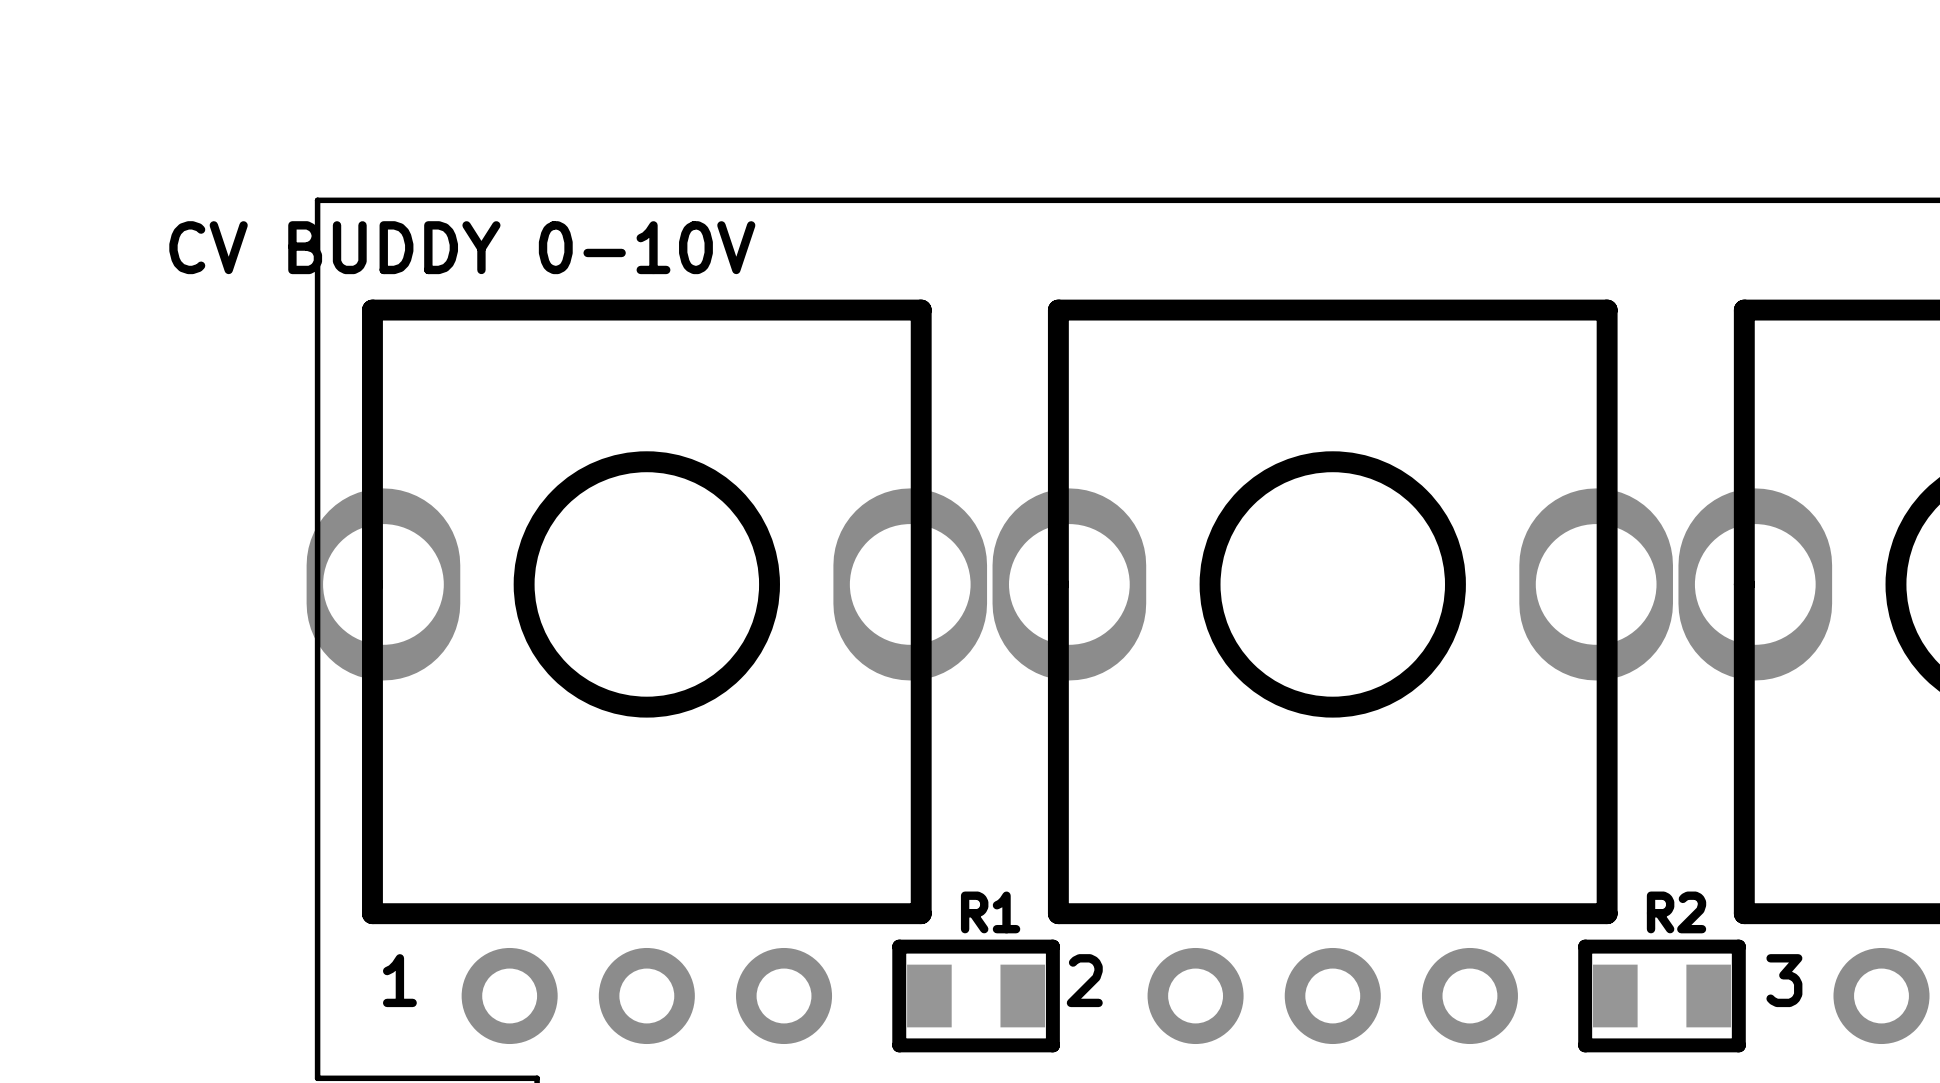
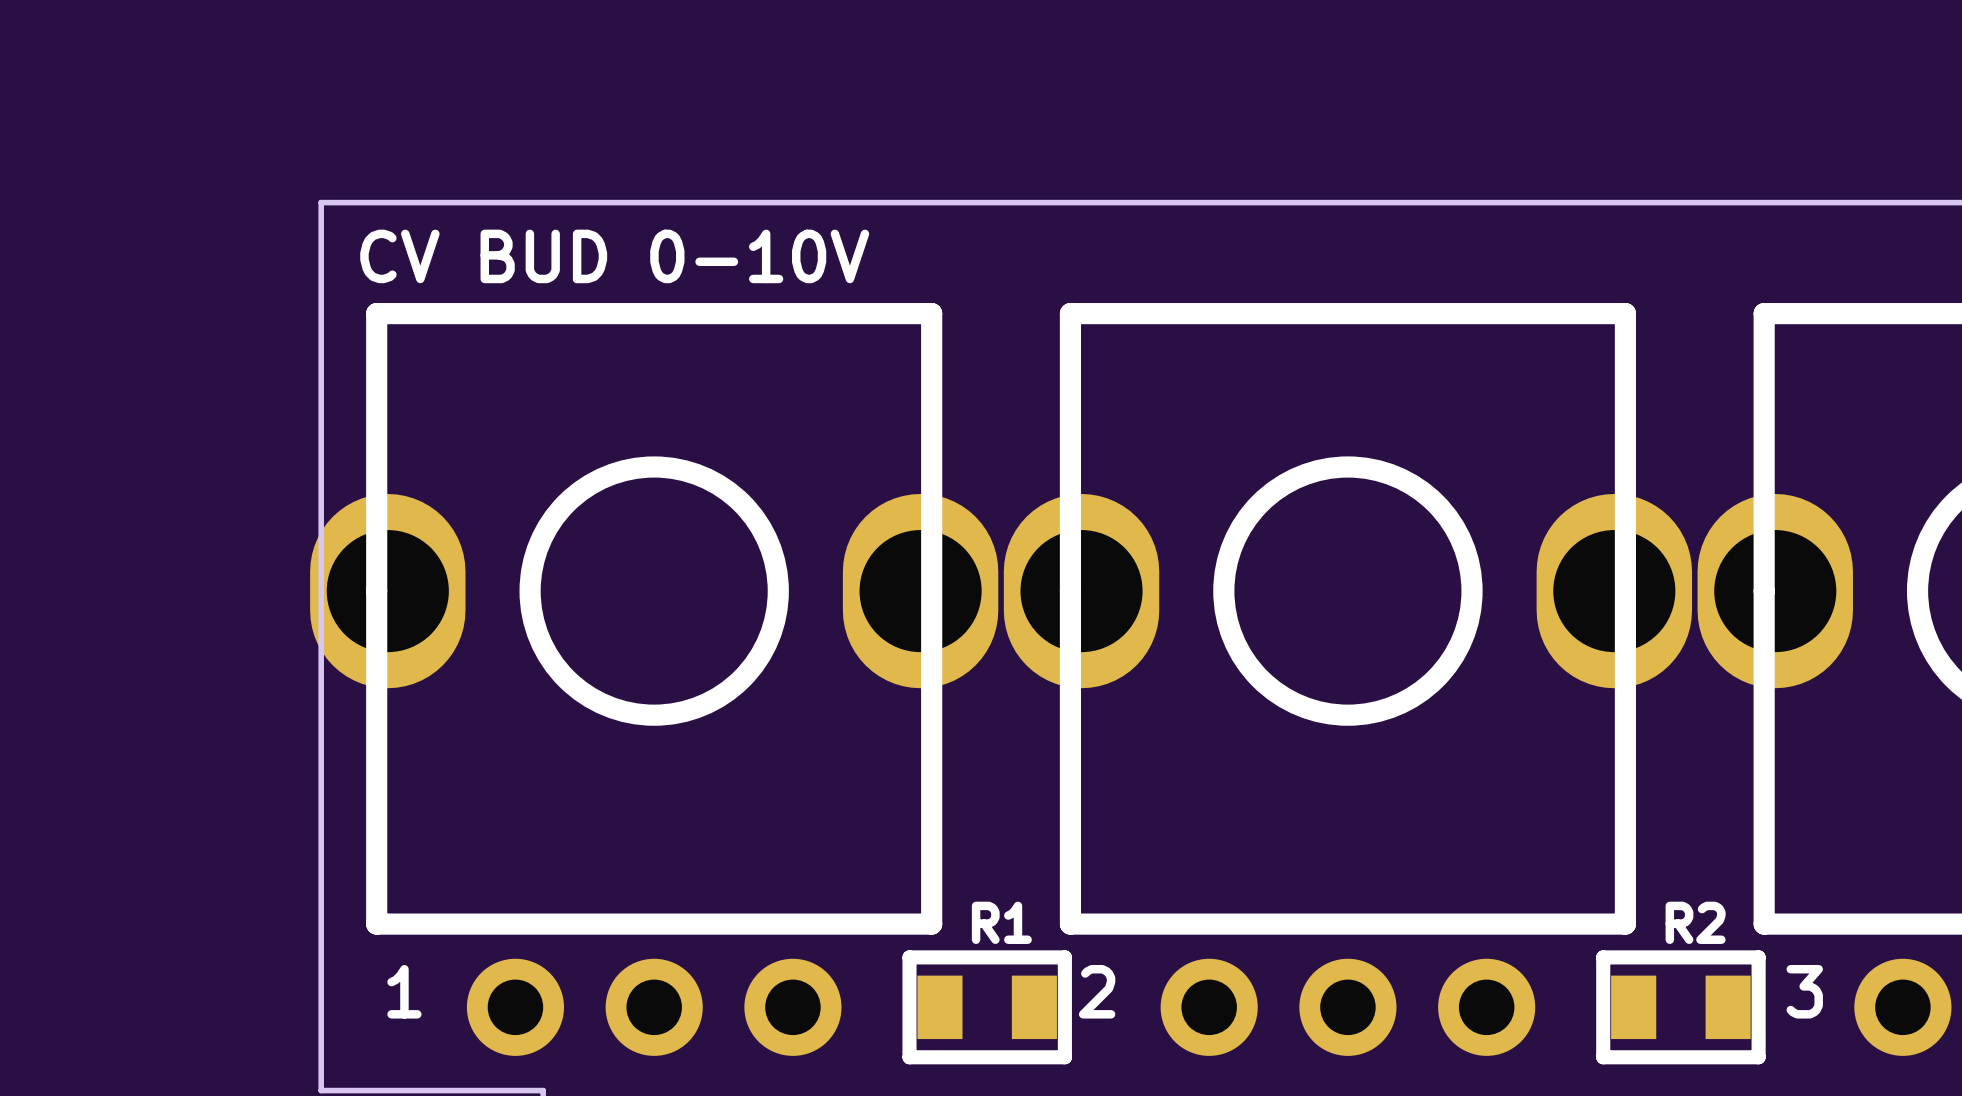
text: CV BUDDY 0-10V (462, 247) -> CV BUD 0-10V (614, 256)

